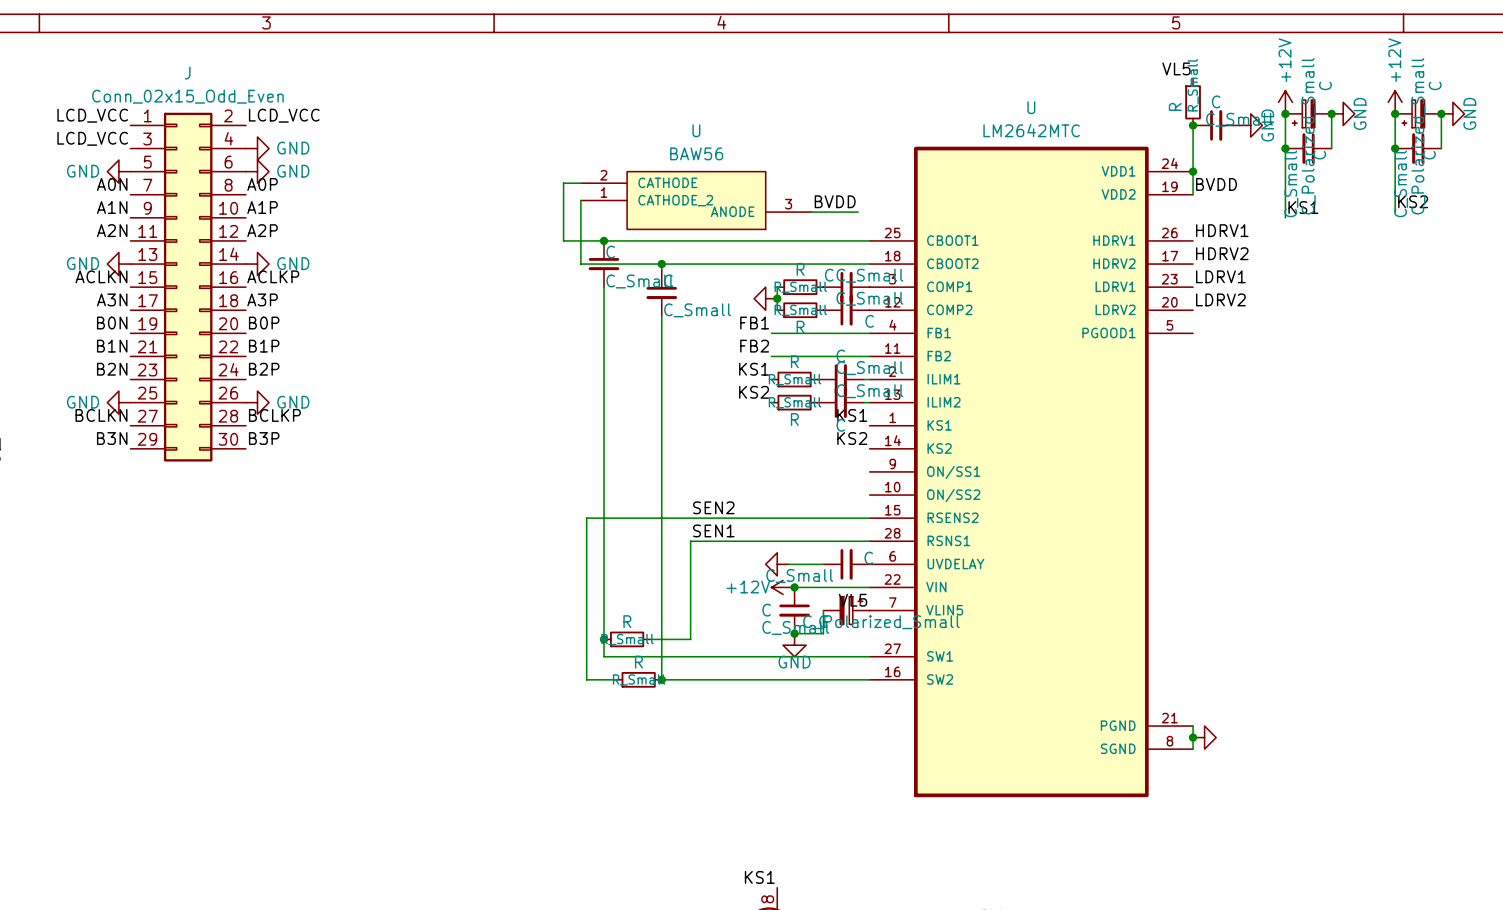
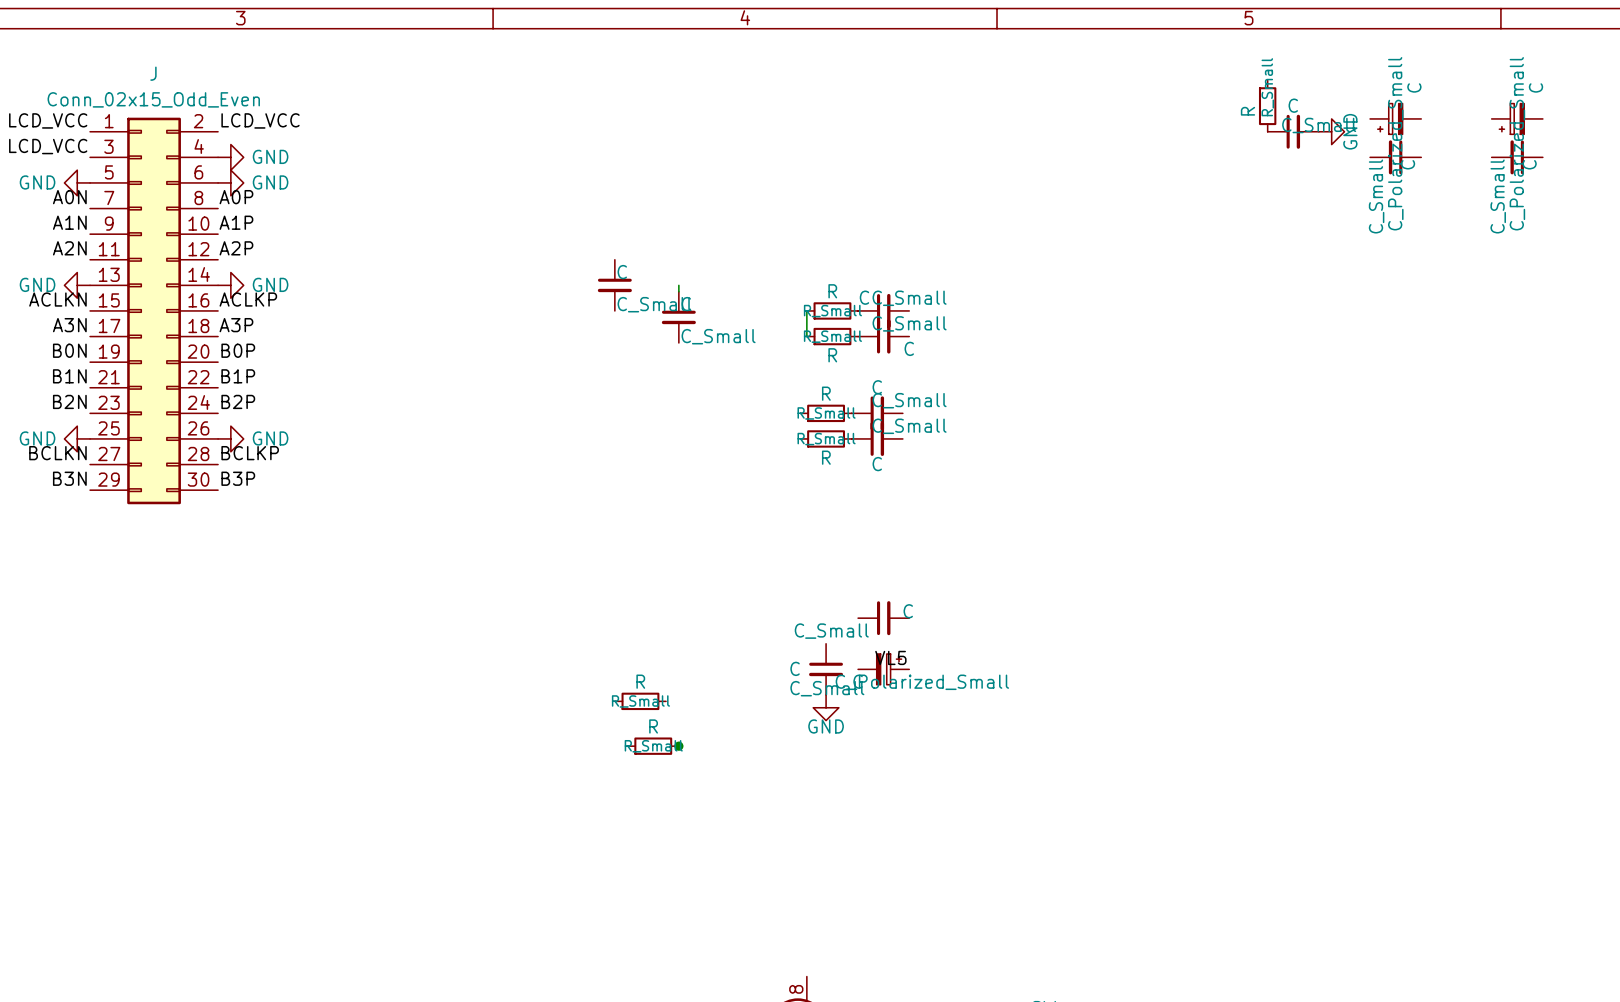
label: VL5 (1176, 68) -> none
power symbol: +12V (1285, 102) -> none
power symbol: +12V (1395, 102) -> none
wire: (1285, 113) (1285, 217) -> none
junction: (1285, 113) -> none
wire: (1331, 113) (1331, 148) -> none
junction: (1331, 113) -> none
power symbol: GND (1343, 113) -> none
wire: (1395, 113) (1395, 212) -> none
junction: (1395, 113) -> none
wire: (1441, 113) (1441, 148) -> none
junction: (1441, 113) -> none
power symbol: GND (1452, 113) -> none
wire: (1193, 125) (1193, 194) -> none
junction: (1193, 125) -> none
junction: (1285, 148) -> none
junction: (1395, 148) -> none
junction: (1193, 171) -> none
wire: (580, 183) (563, 183) (563, 240) (869, 240) -> none
label: BVDD (1216, 184) -> none
wire: (580, 200) (580, 264) (869, 264) -> none
U: BAW56 (696, 200) -> none
label: BVDD (835, 201) -> none
label: KS2 (1413, 201) -> none
label: KS1 (1303, 207) -> none
wire: (811, 212) (858, 212) -> none
label: HDRV1 (1222, 230) -> none
junction: (604, 240) -> none
label: HDRV2 (1222, 253) -> none
junction: (661, 264) -> none
label: LDRV1 (1220, 276) -> none
wire: (604, 287) (604, 656) (869, 656) -> none
power symbol: (765, 298) -> none
junction: (777, 298) -> none
label: LDRV2 (1220, 299) -> none
wire: (661, 316) (661, 679) (869, 679) -> none
label: FB1 (754, 323) -> none
wire: (771, 333) (869, 333) -> none
label: FB2 (754, 346) -> none
wire: (771, 356) (869, 356) -> none
label: KS1 (754, 369) -> none
wire: (863, 379) (869, 379) -> none
label: KS2 (754, 392) -> none
wire: (863, 402) (869, 402) -> none
label: KS1 (852, 415) -> none
label: KS2 (852, 438) -> none
U: LM2642MTC (1031, 471) -> none
label: SEN2 (713, 507) -> none
wire: (869, 518) (586, 518) (586, 679) (615, 679) -> none
label: SEN1 (713, 530) -> none
wire: (869, 541) (690, 541) (690, 639) (650, 639) -> none
power symbol: (777, 564) -> none
wire: (788, 564) (823, 564) -> none
power symbol: +12V (783, 587) -> none
wire: (794, 587) (869, 587) -> none
junction: (794, 587) -> none
wire: (823, 610) (823, 633) (794, 633) -> none
junction: (794, 633) -> none
junction: (604, 639) -> none
wire: (1193, 726) (1193, 749) -> none
junction: (1193, 737) -> none
power symbol: (1204, 737) -> none
label: KS1 (759, 877) -> none

